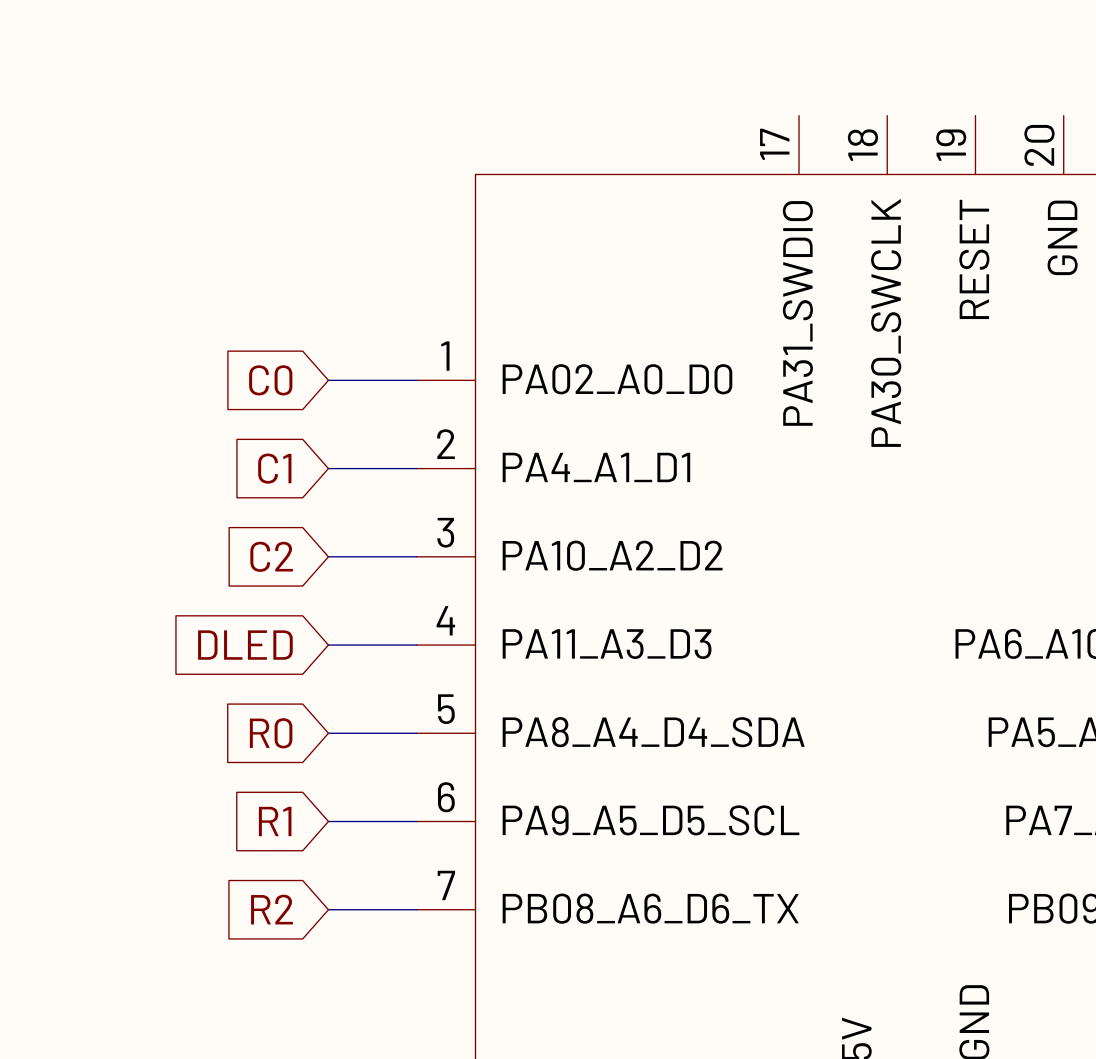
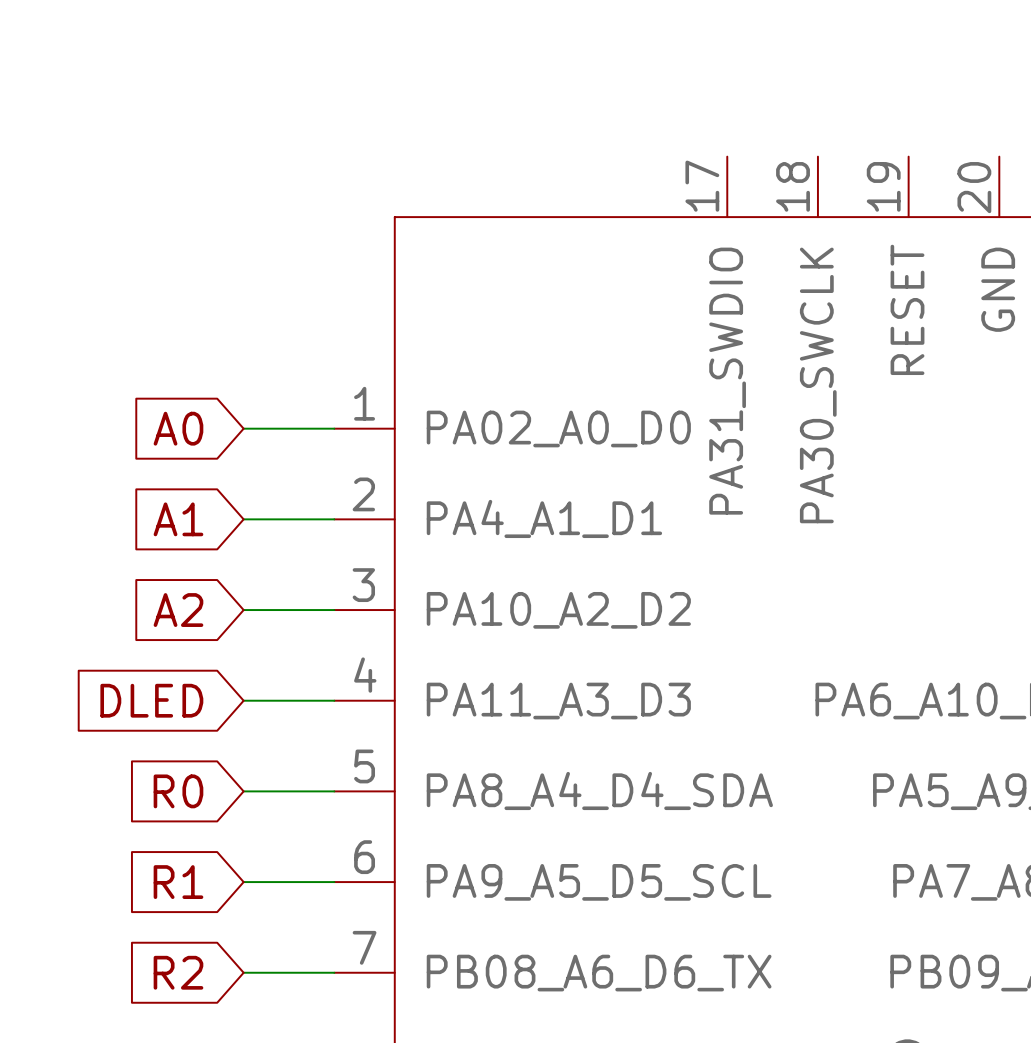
global label: C0 (270, 380) -> A0 (178, 428)
global label: C1 (274, 468) -> A1 (178, 519)
global label: C2 (271, 556) -> A2 (178, 610)

